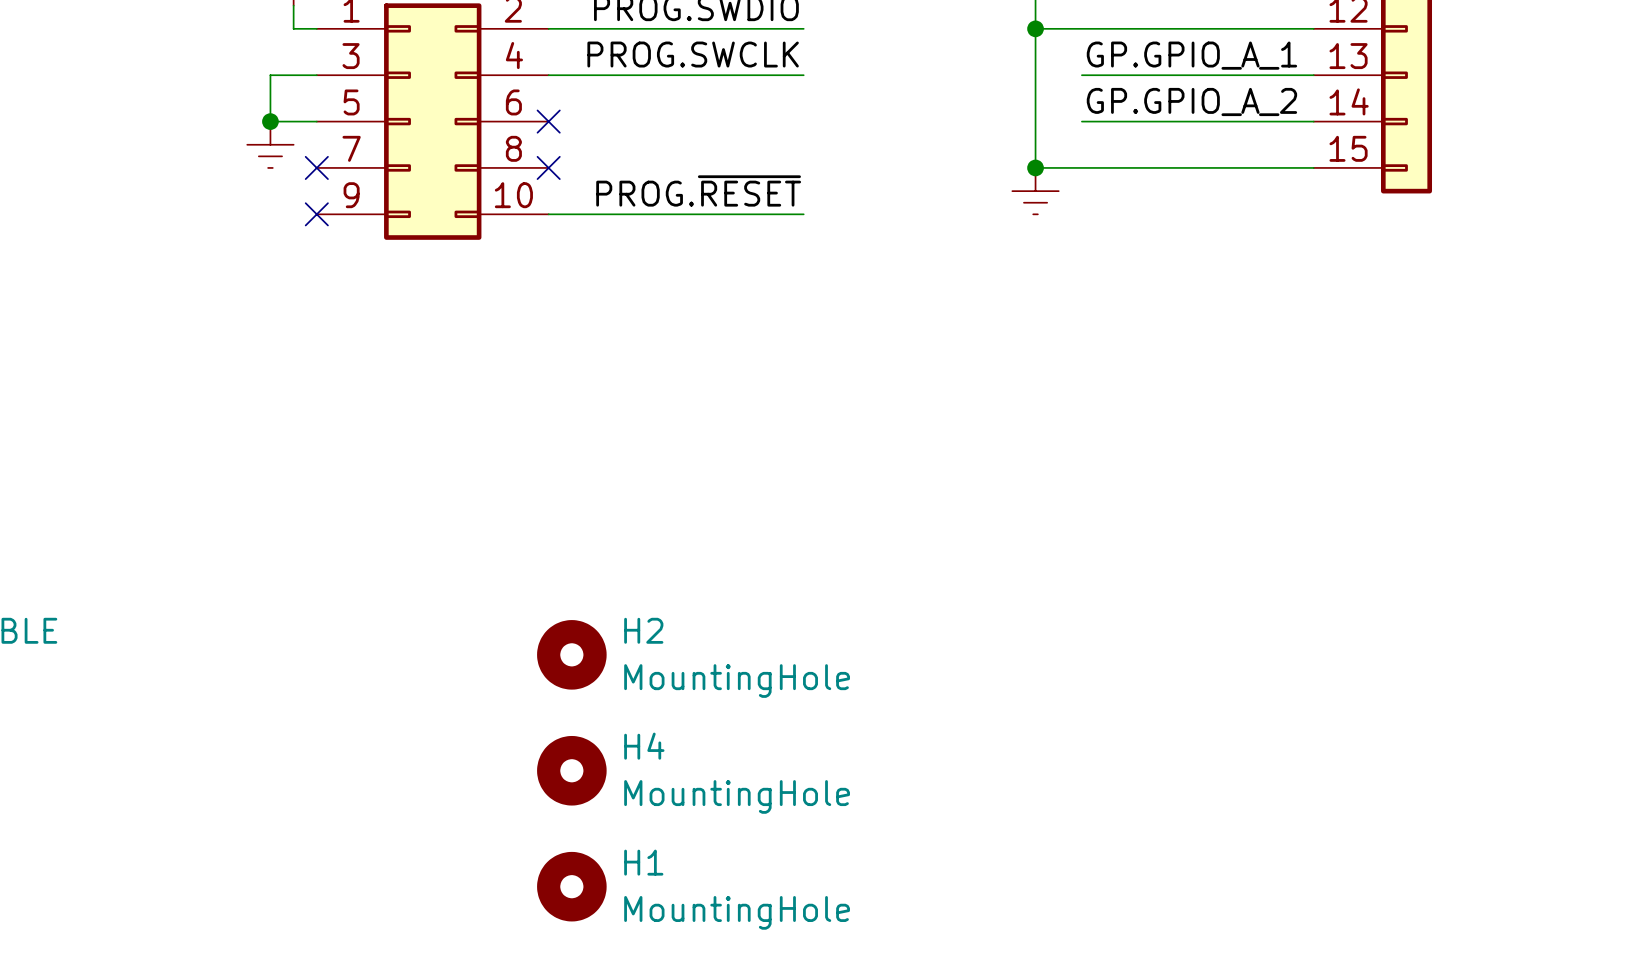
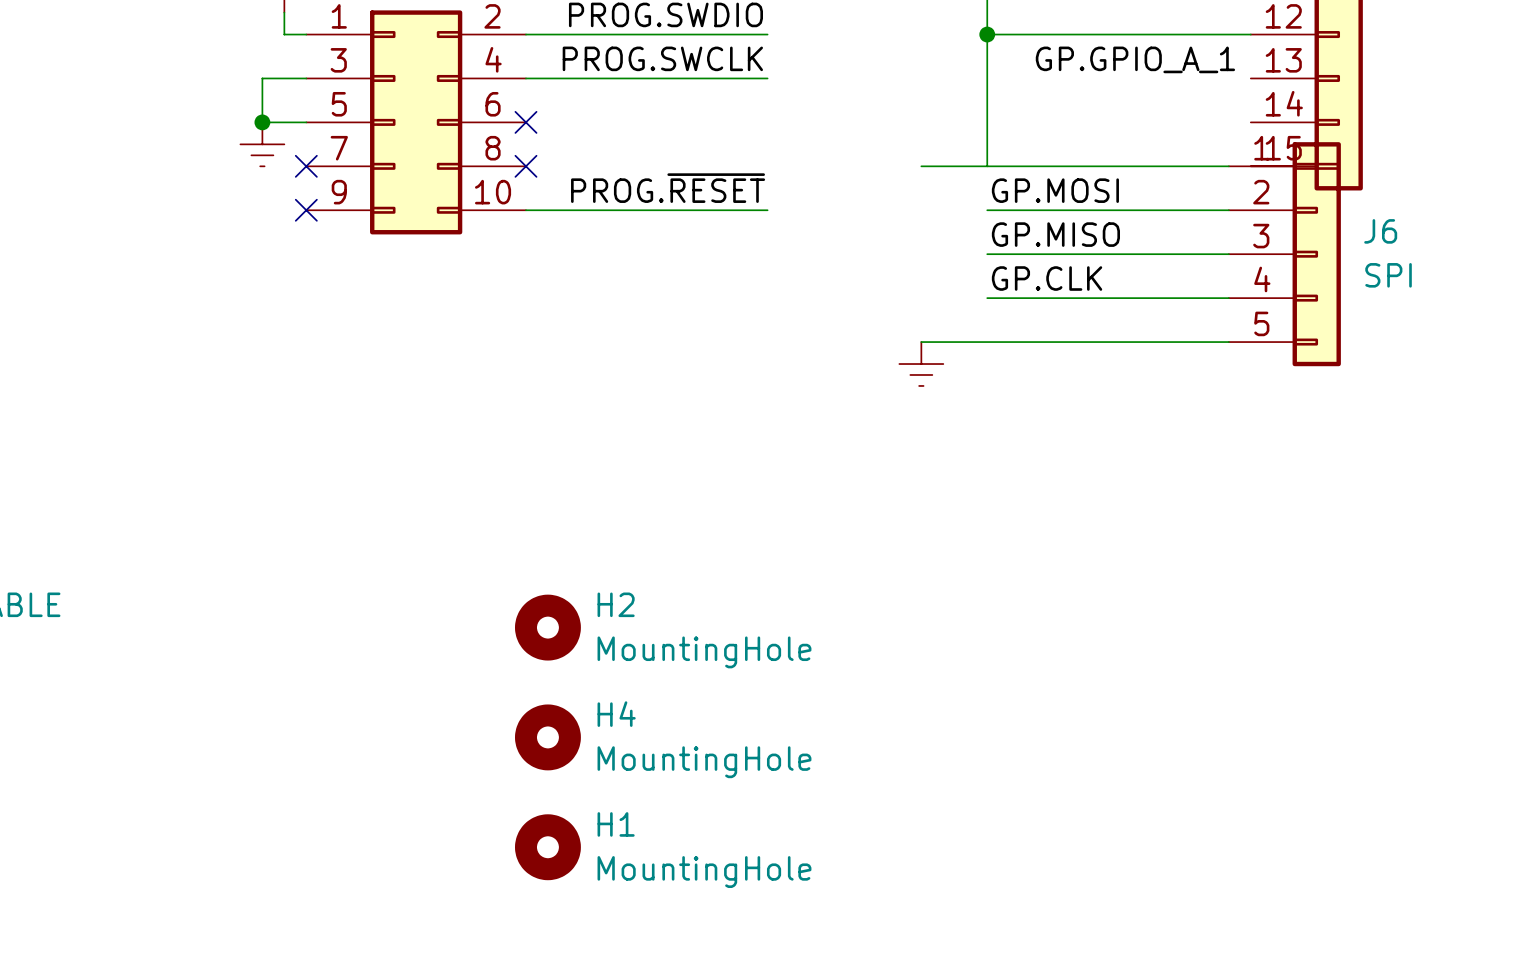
wire: (1081, 75) (1313, 75) -> none
label: GP.GPIO_A_2 (1191, 102) -> none
wire: (1081, 121) (1313, 121) -> none
wire: none -> (921, 166) (987, 166)
junction: (1035, 167) -> none
power symbol position: (1035, 191) -> (921, 364)
label: none -> GP.MOSI (1055, 190)
wire: none -> (987, 210) (1228, 210)
label: none -> GP.MISO (1055, 234)
wire: none -> (987, 254) (1228, 254)
J6: none -> SPI (1284, 254)
label: none -> GP.CLK (1047, 278)
wire: none -> (987, 298) (1228, 298)
wire: none -> (921, 342) (1228, 342)

